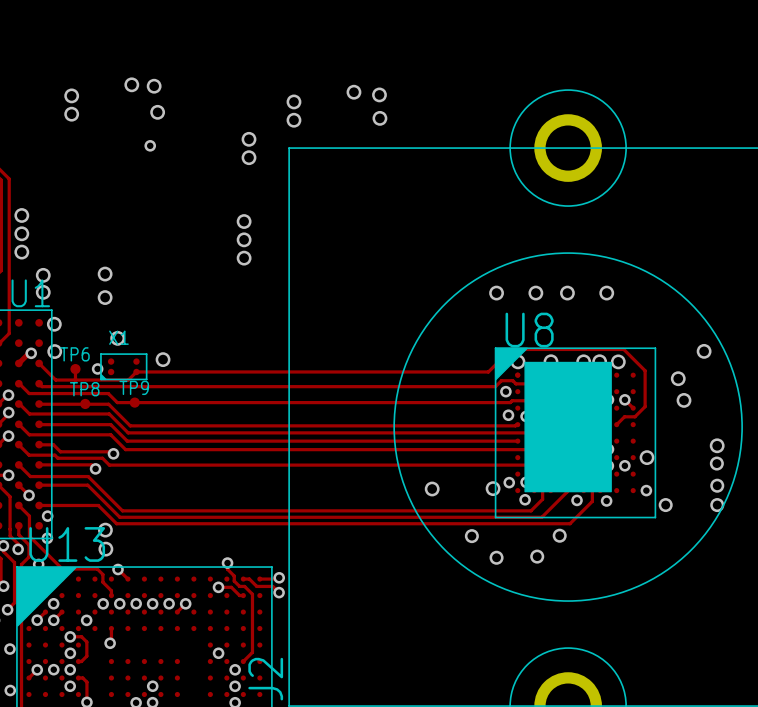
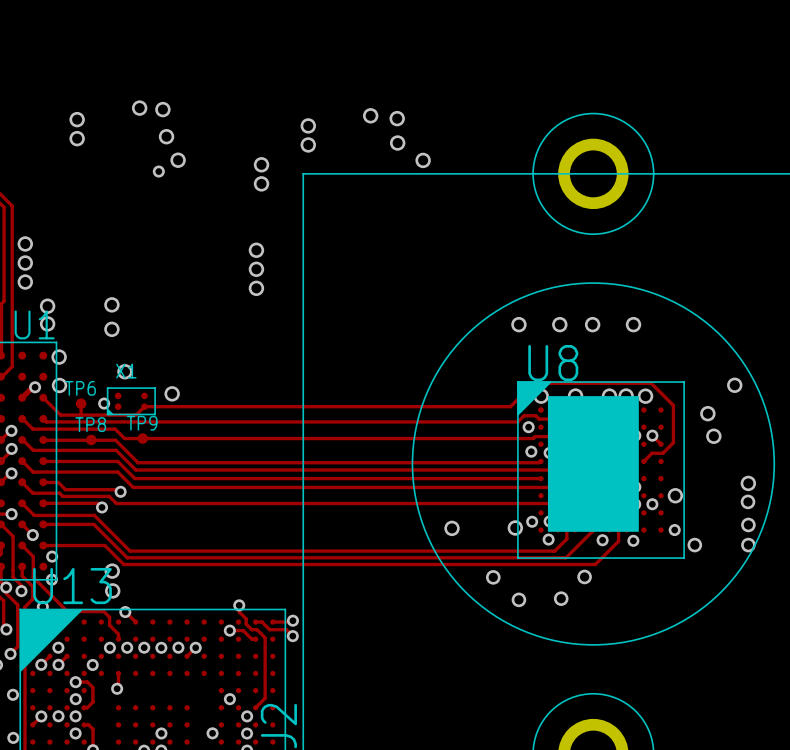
via: none -> (178, 160)
via: none -> (423, 160)
via: none -> (212, 733)

